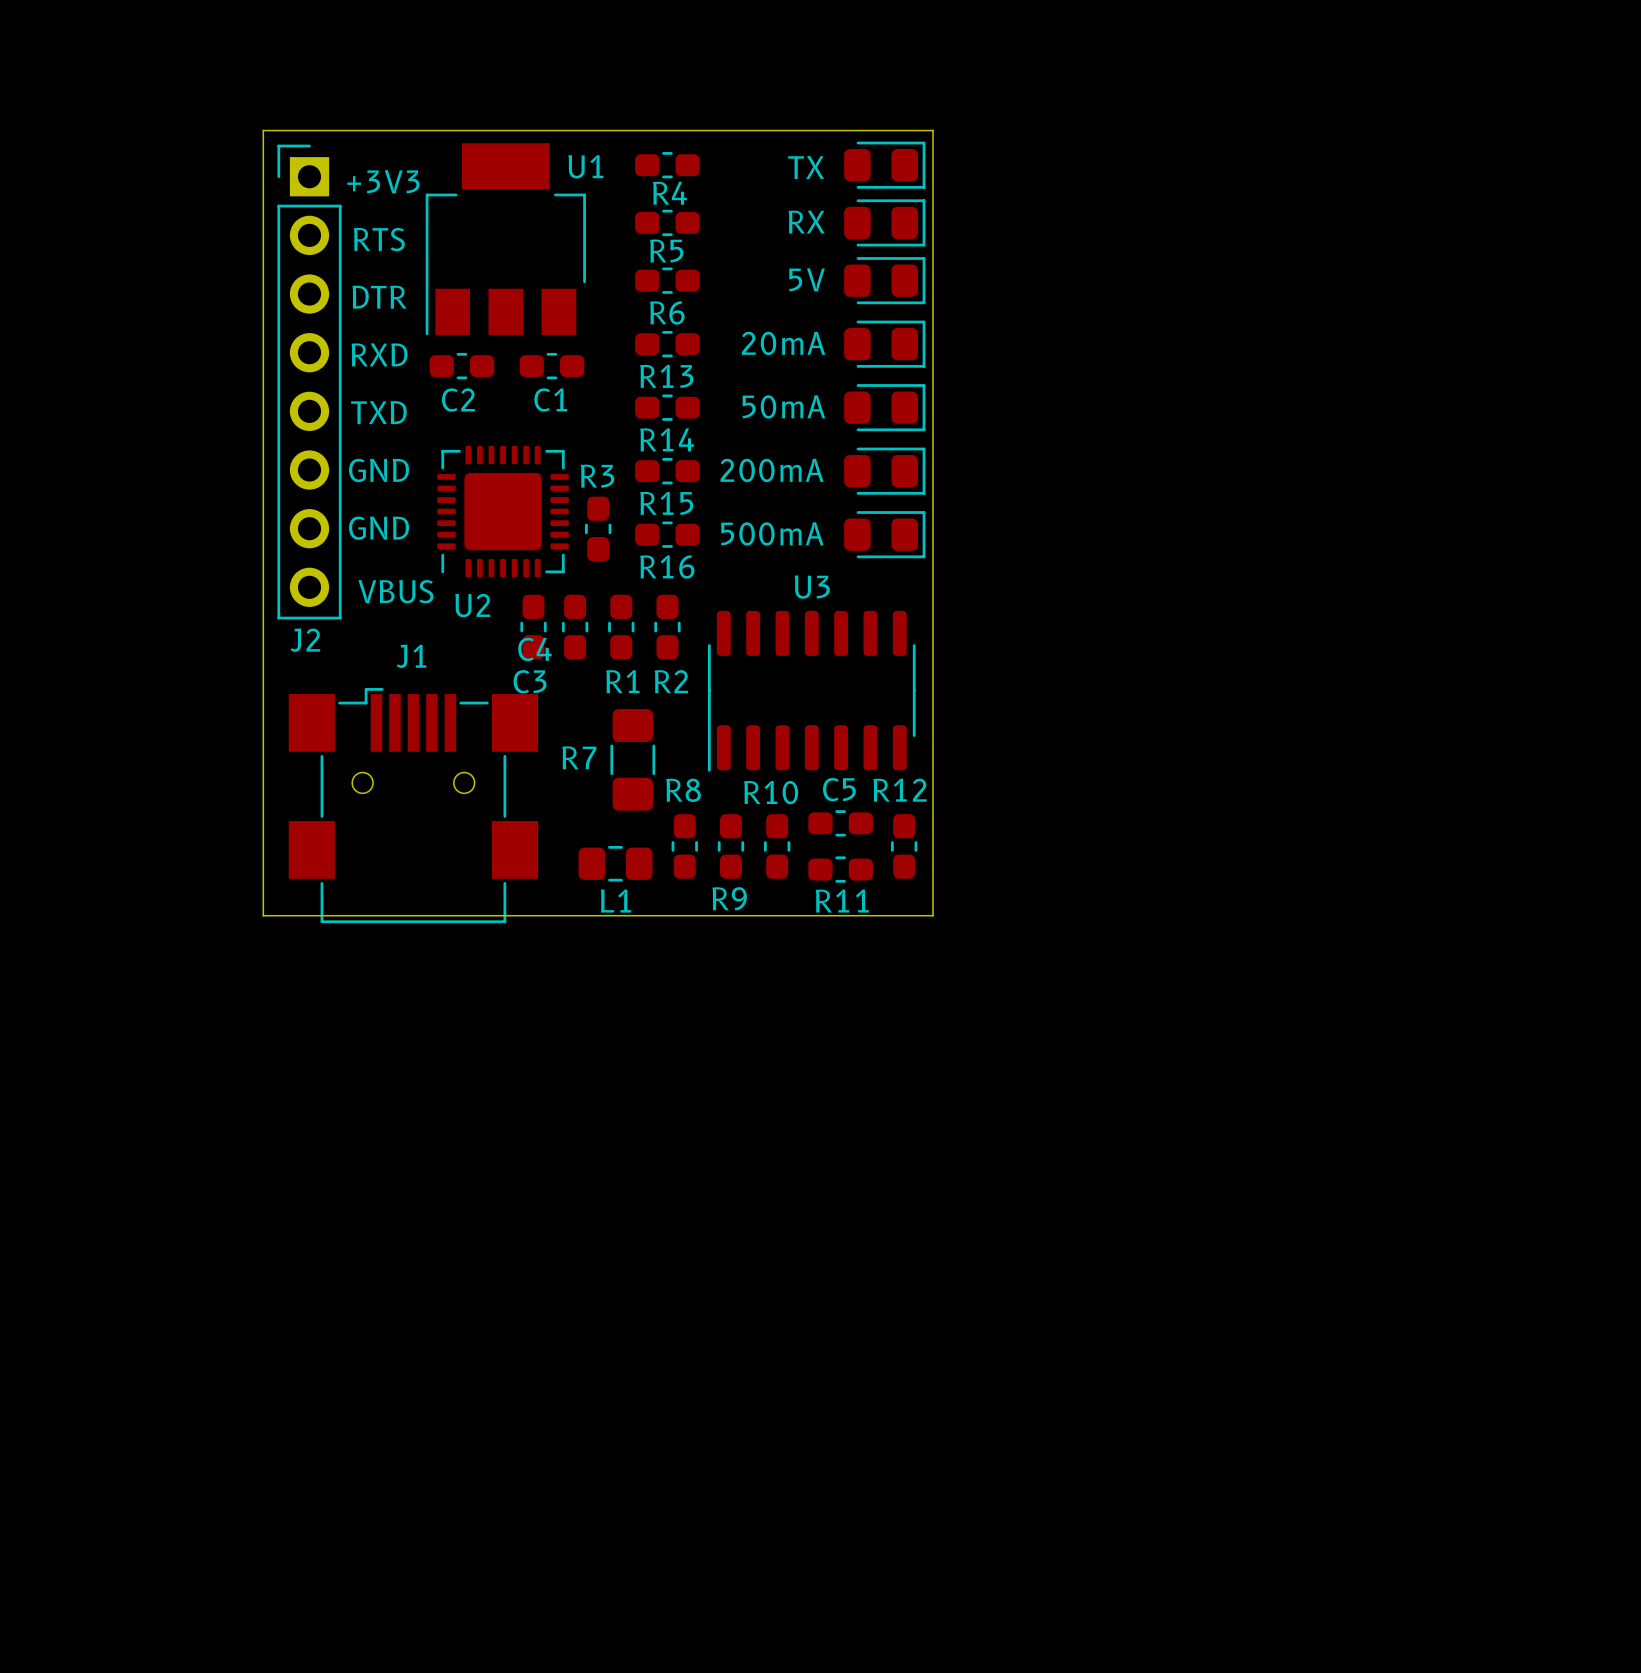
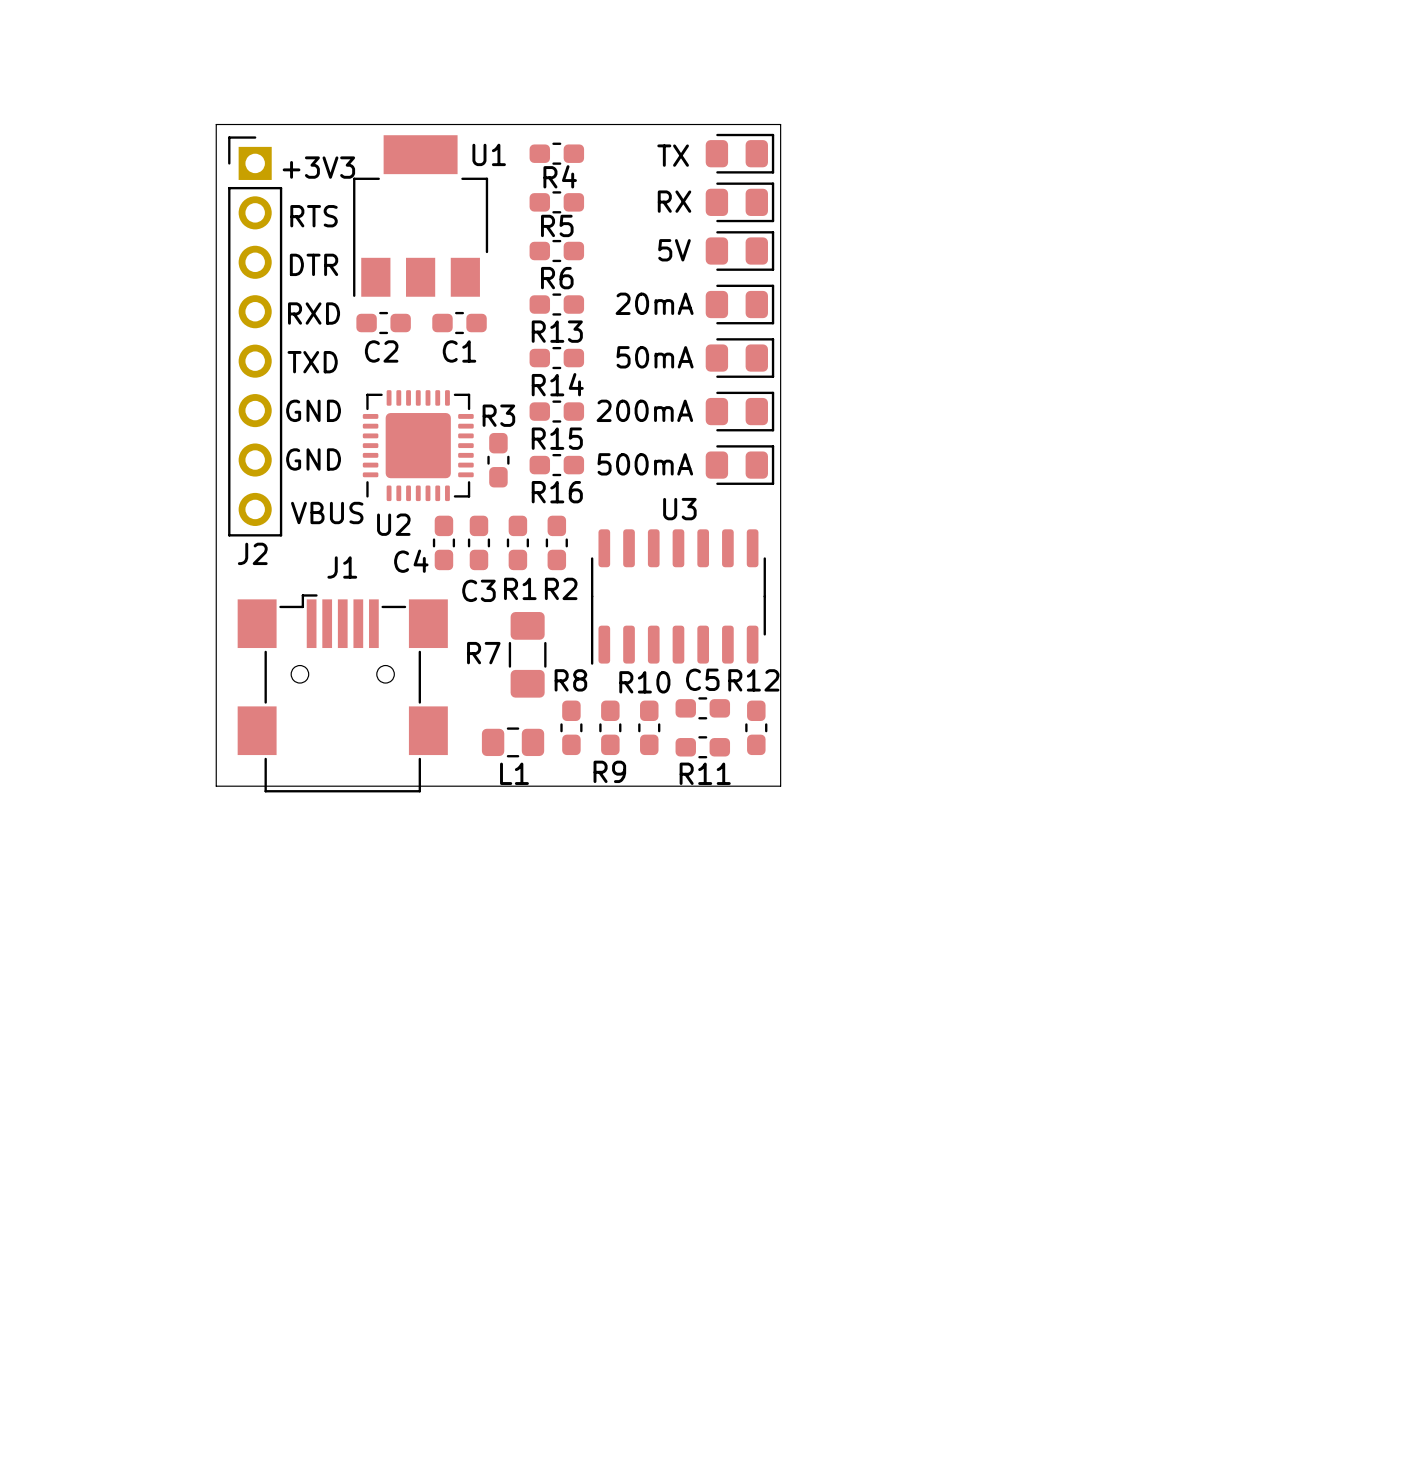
C4 name position: C4 (534, 649) -> C4 (411, 561)
C3 name position: C3 (530, 681) -> C3 (478, 590)

